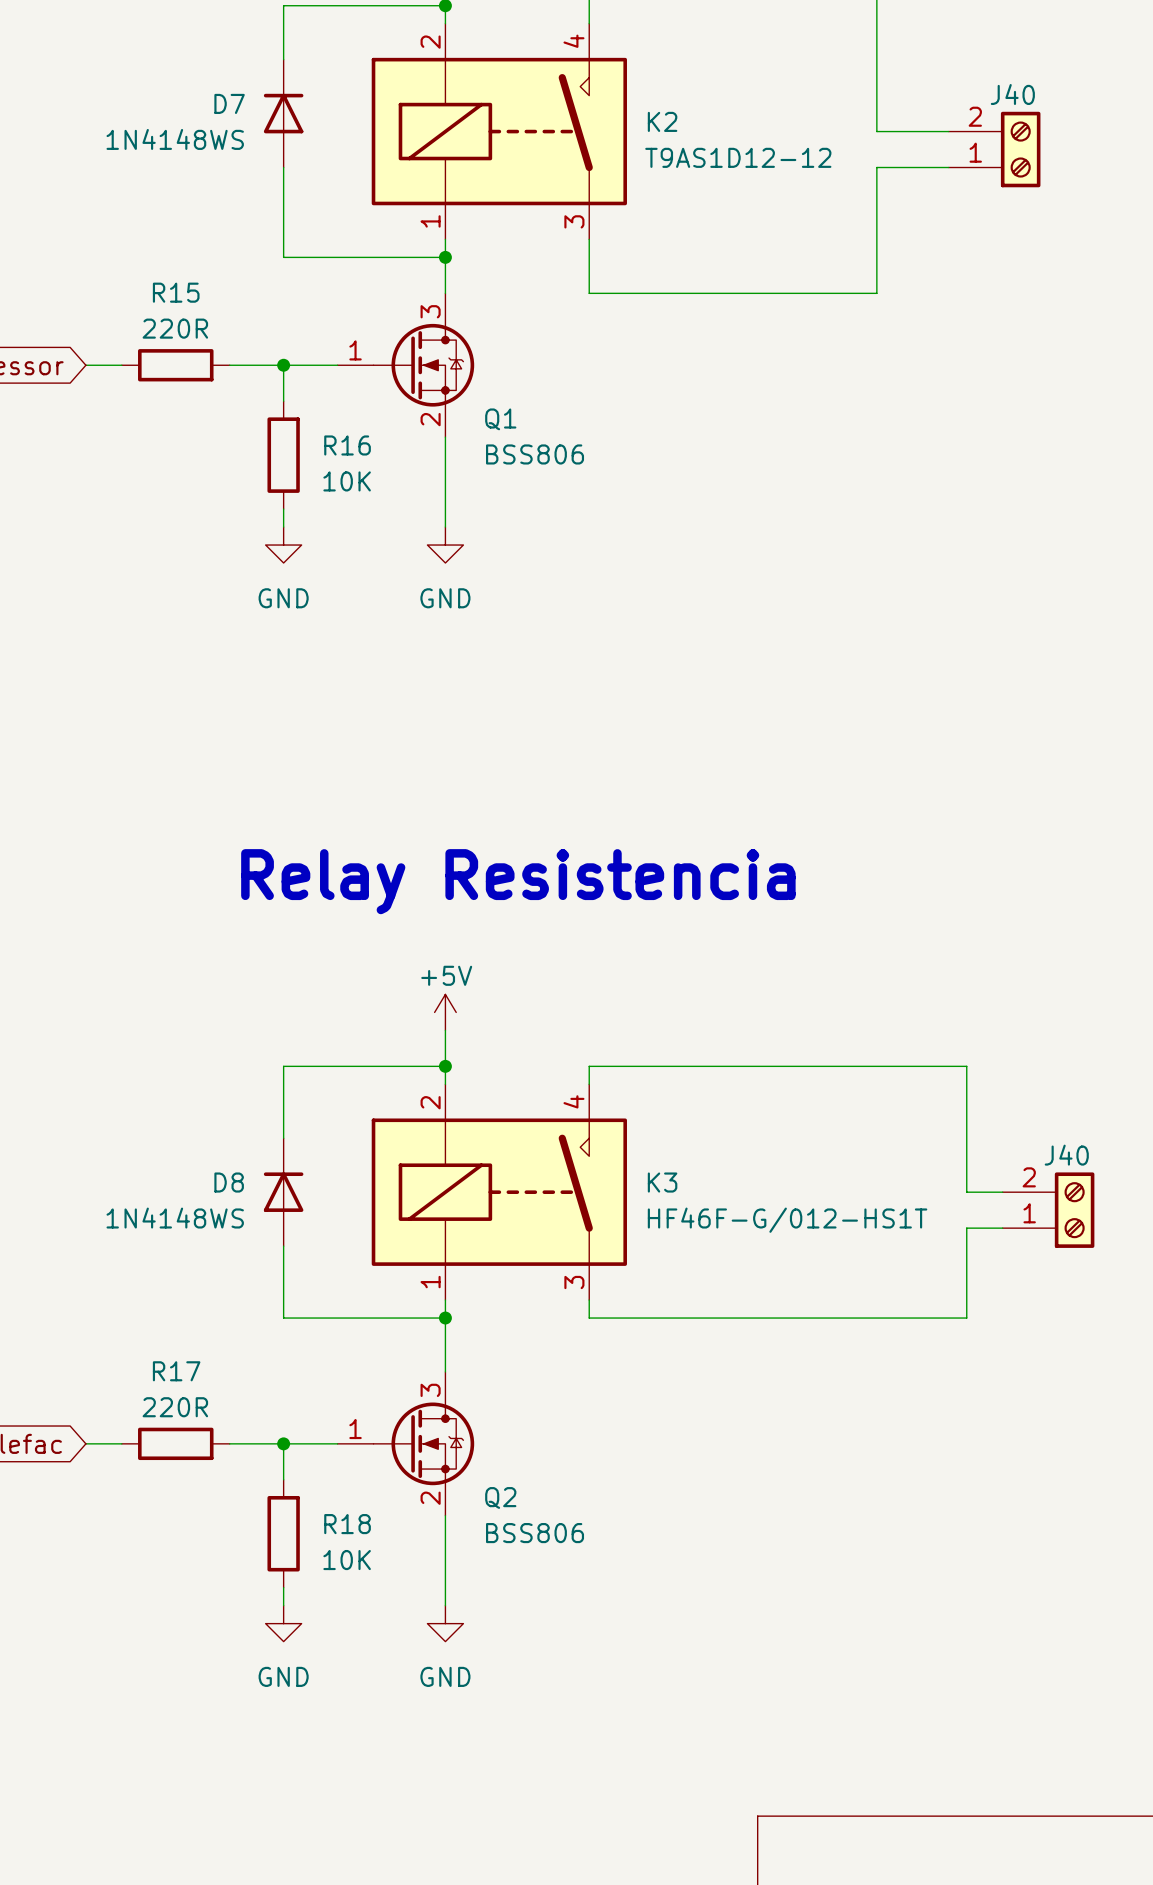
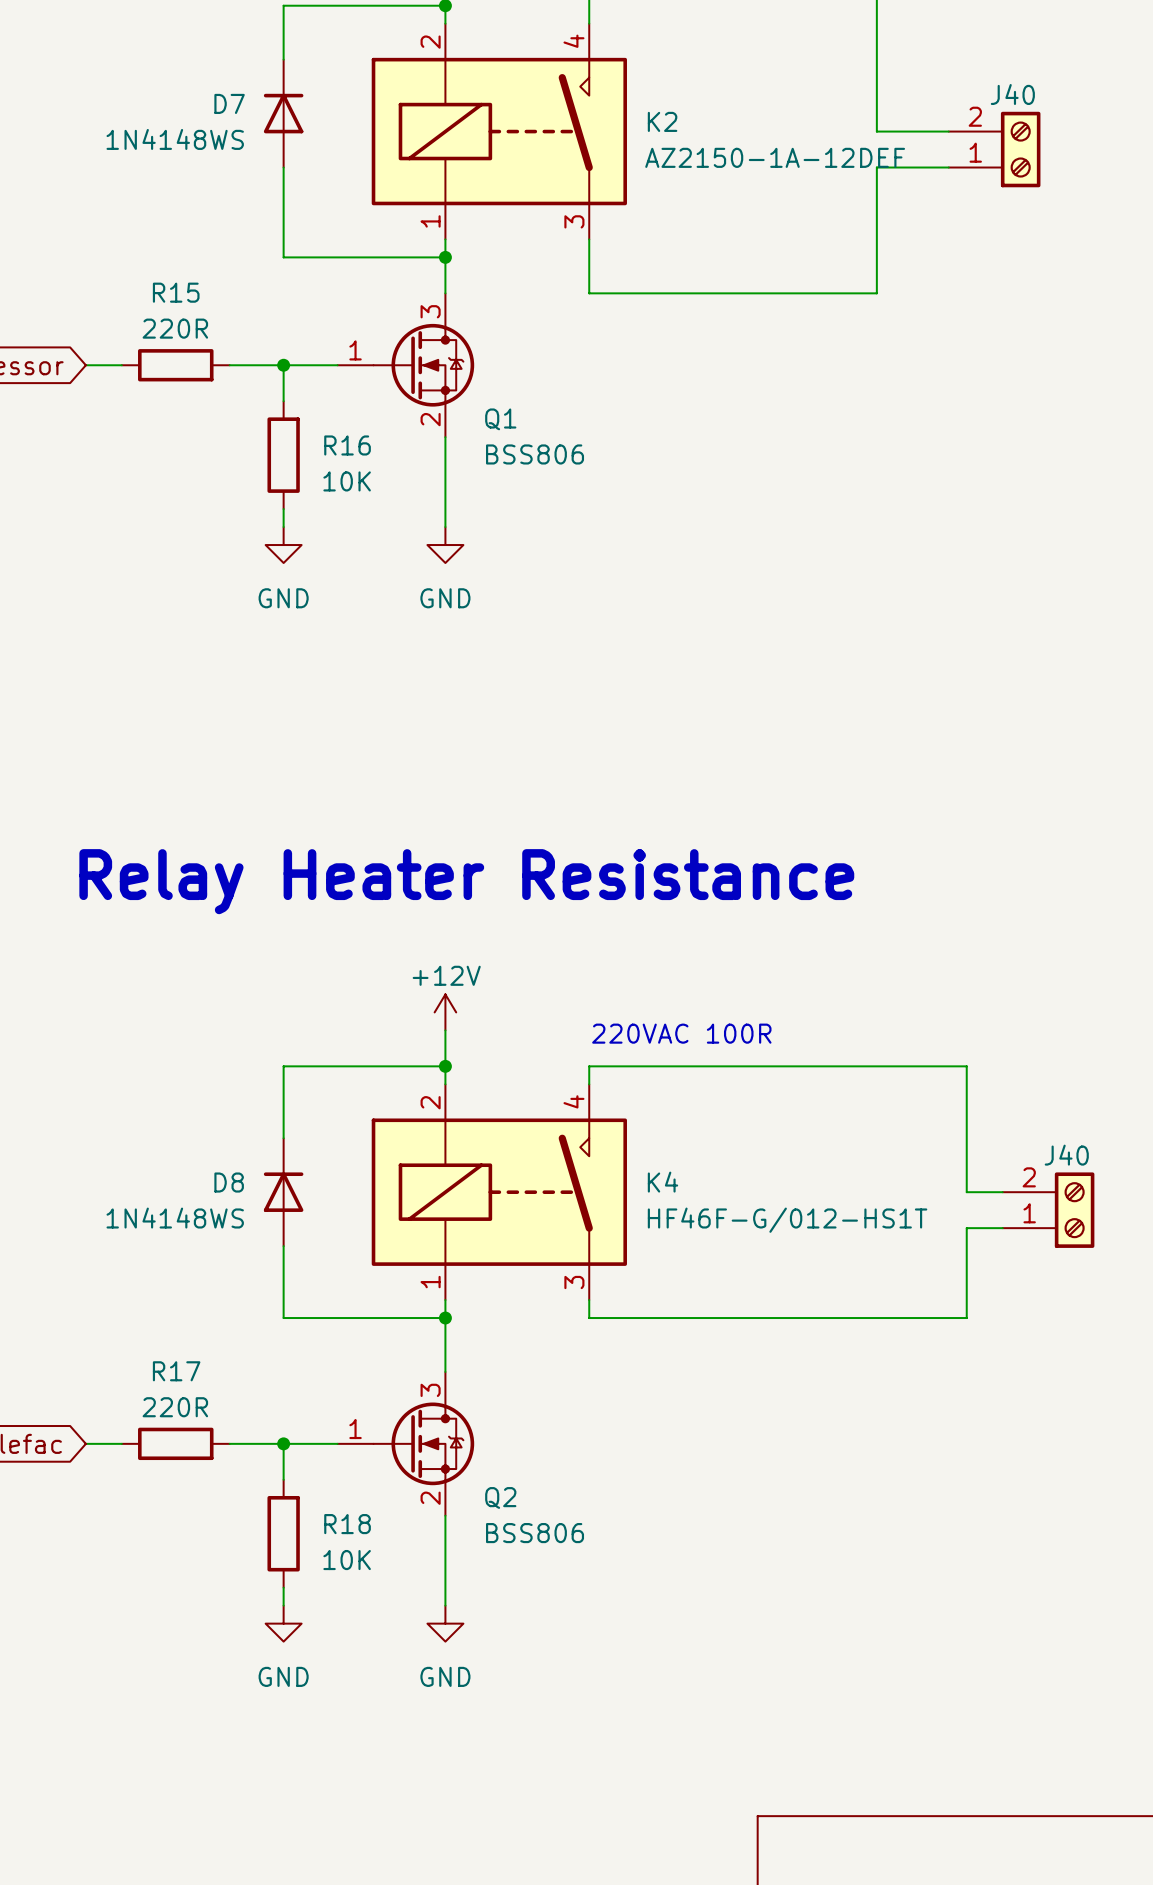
K2 value: T9AS1D12-12 (738, 157) -> AZ2150-1A-12DEF (775, 157)
text: Relay Resistencia (518, 881) -> Relay Heater Resistance (466, 881)
power symbol: +5V (445, 1012) -> +12V (445, 1012)
text: none -> 220VAC 100R (681, 1033)
K3 name: K3 (662, 1182) -> K4 (662, 1182)

